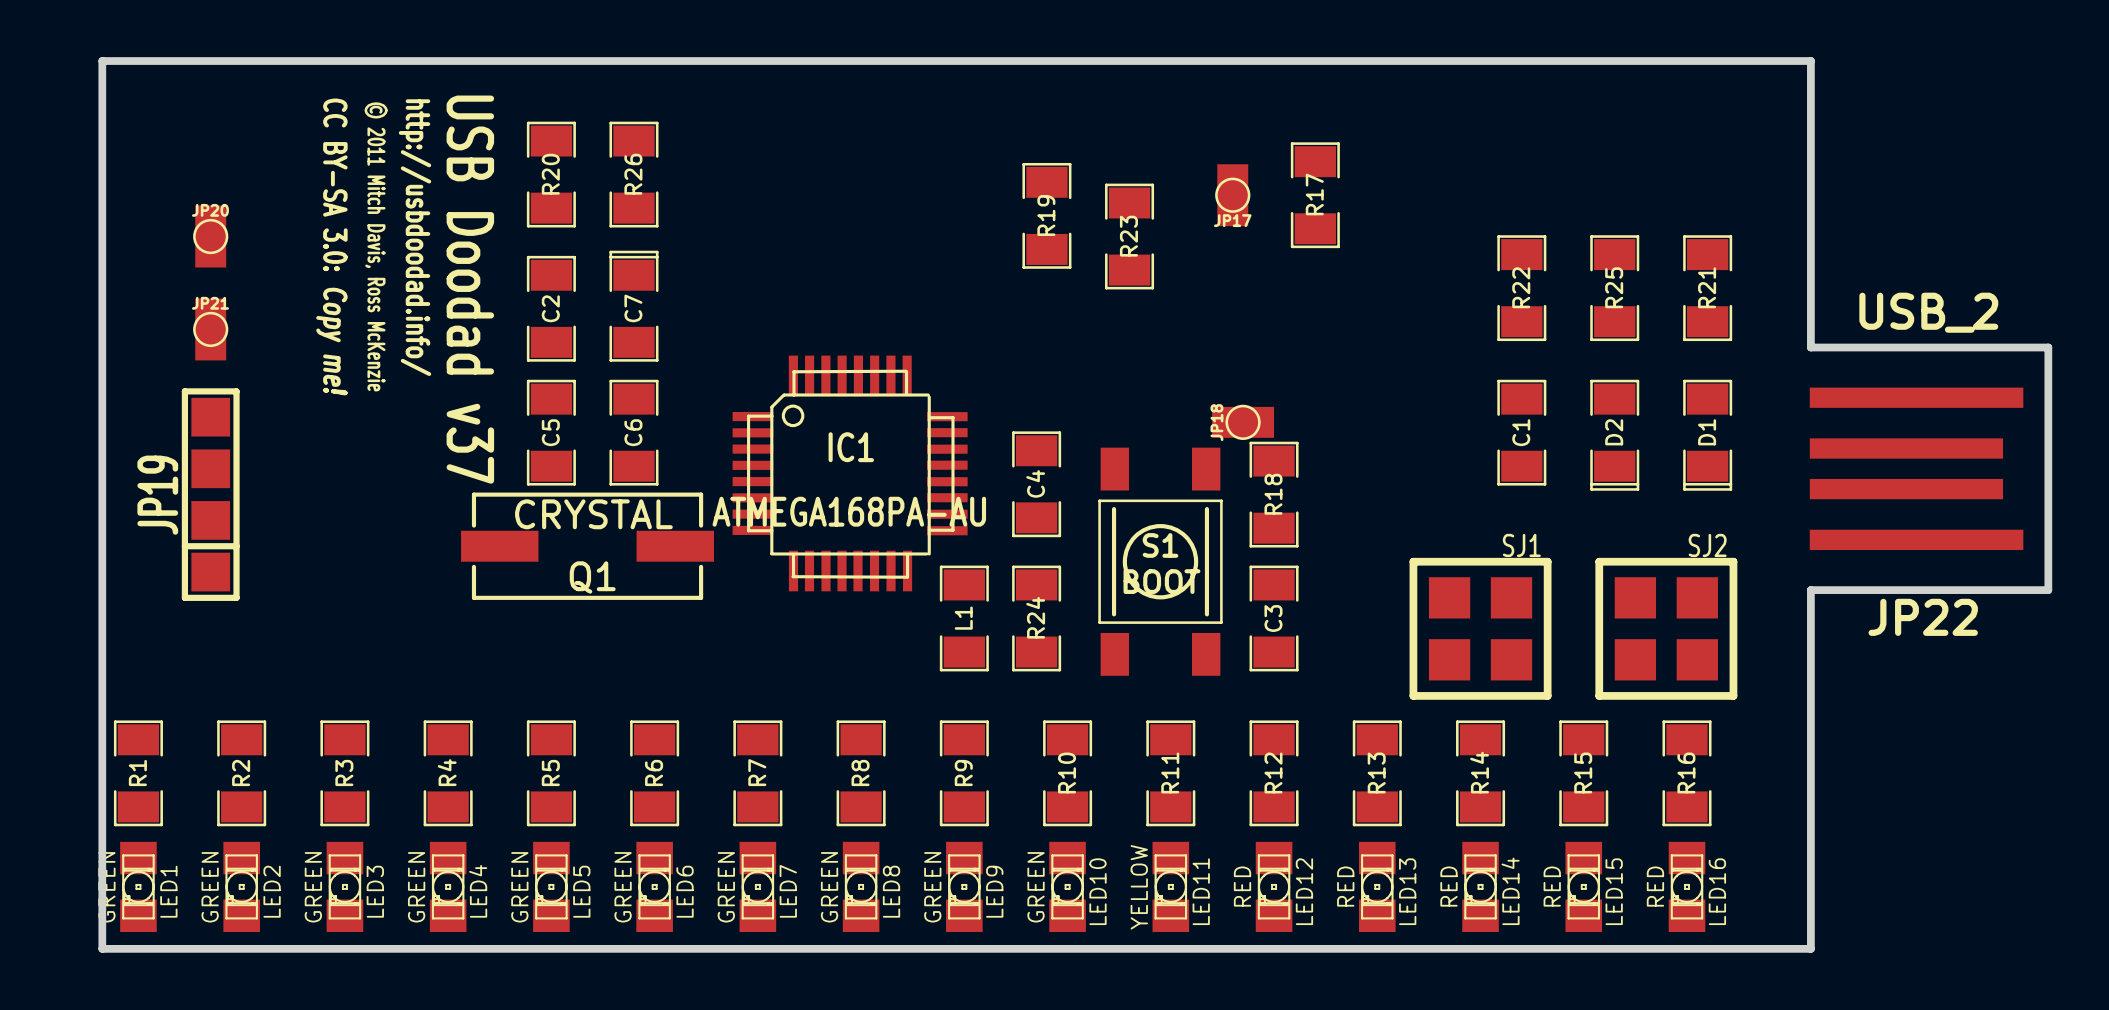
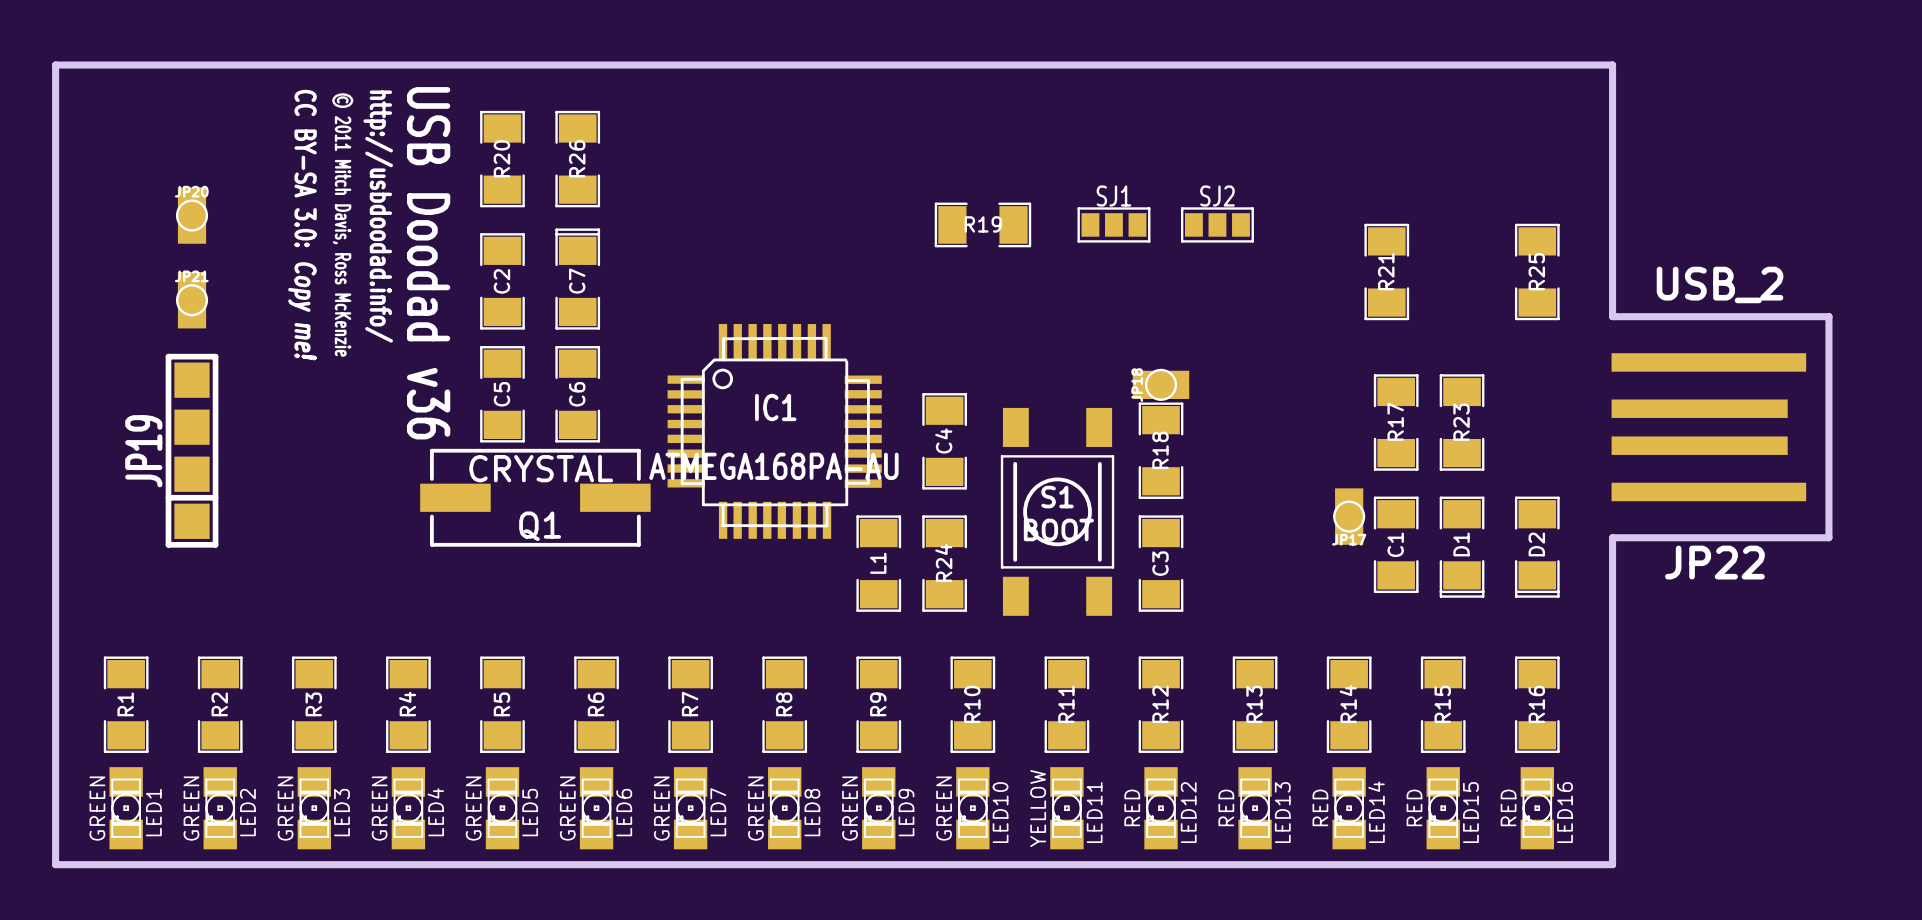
JP17 position: (1232, 195) -> (1349, 516)
R17 position: (1315, 195) -> (1396, 422)
R19 rotation: 0° (1046, 215) -> 90° clockwise (982, 224)
R23 position: (1129, 236) -> (1462, 422)
R22: (1521, 288) -> none
R25 position: (1614, 288) -> (1537, 271)
R21 position: (1707, 288) -> (1386, 271)
text: USB Doodad v37 (470, 289) -> USB Doodad v36 (428, 263)
board edge: (1810, 347) (1810, 61) (102, 61) (102, 948) -> (1650, 316) (1612, 316) (1612, 65) (55, 65) (55, 864) (93, 864)
board edge: (2007, 347) (2048, 347) (2048, 590) (2007, 590) -> (1828, 316) (1828, 537)
JP18 position: (1243, 422) -> (1161, 384)
C1 position: (1521, 432) -> (1396, 544)
D2 position: (1614, 435) -> (1537, 547)
D1 position: (1707, 435) -> (1462, 547)
JP22 position: (1929, 468) -> (1720, 427)
SJ1 name position: SJ1 (1521, 545) -> SJ1 (1113, 196)
SJ2 name position: SJ2 (1707, 545) -> SJ2 (1217, 196)
SJ1 footprint: [1409, 557, 1552, 700] -> [1077, 207, 1151, 243]
SJ2 footprint: [1595, 557, 1738, 700] -> [1181, 207, 1254, 243]
board edge: (1810, 590) (1810, 948) (1769, 948) -> (1650, 537) (1612, 537) (1612, 864)

